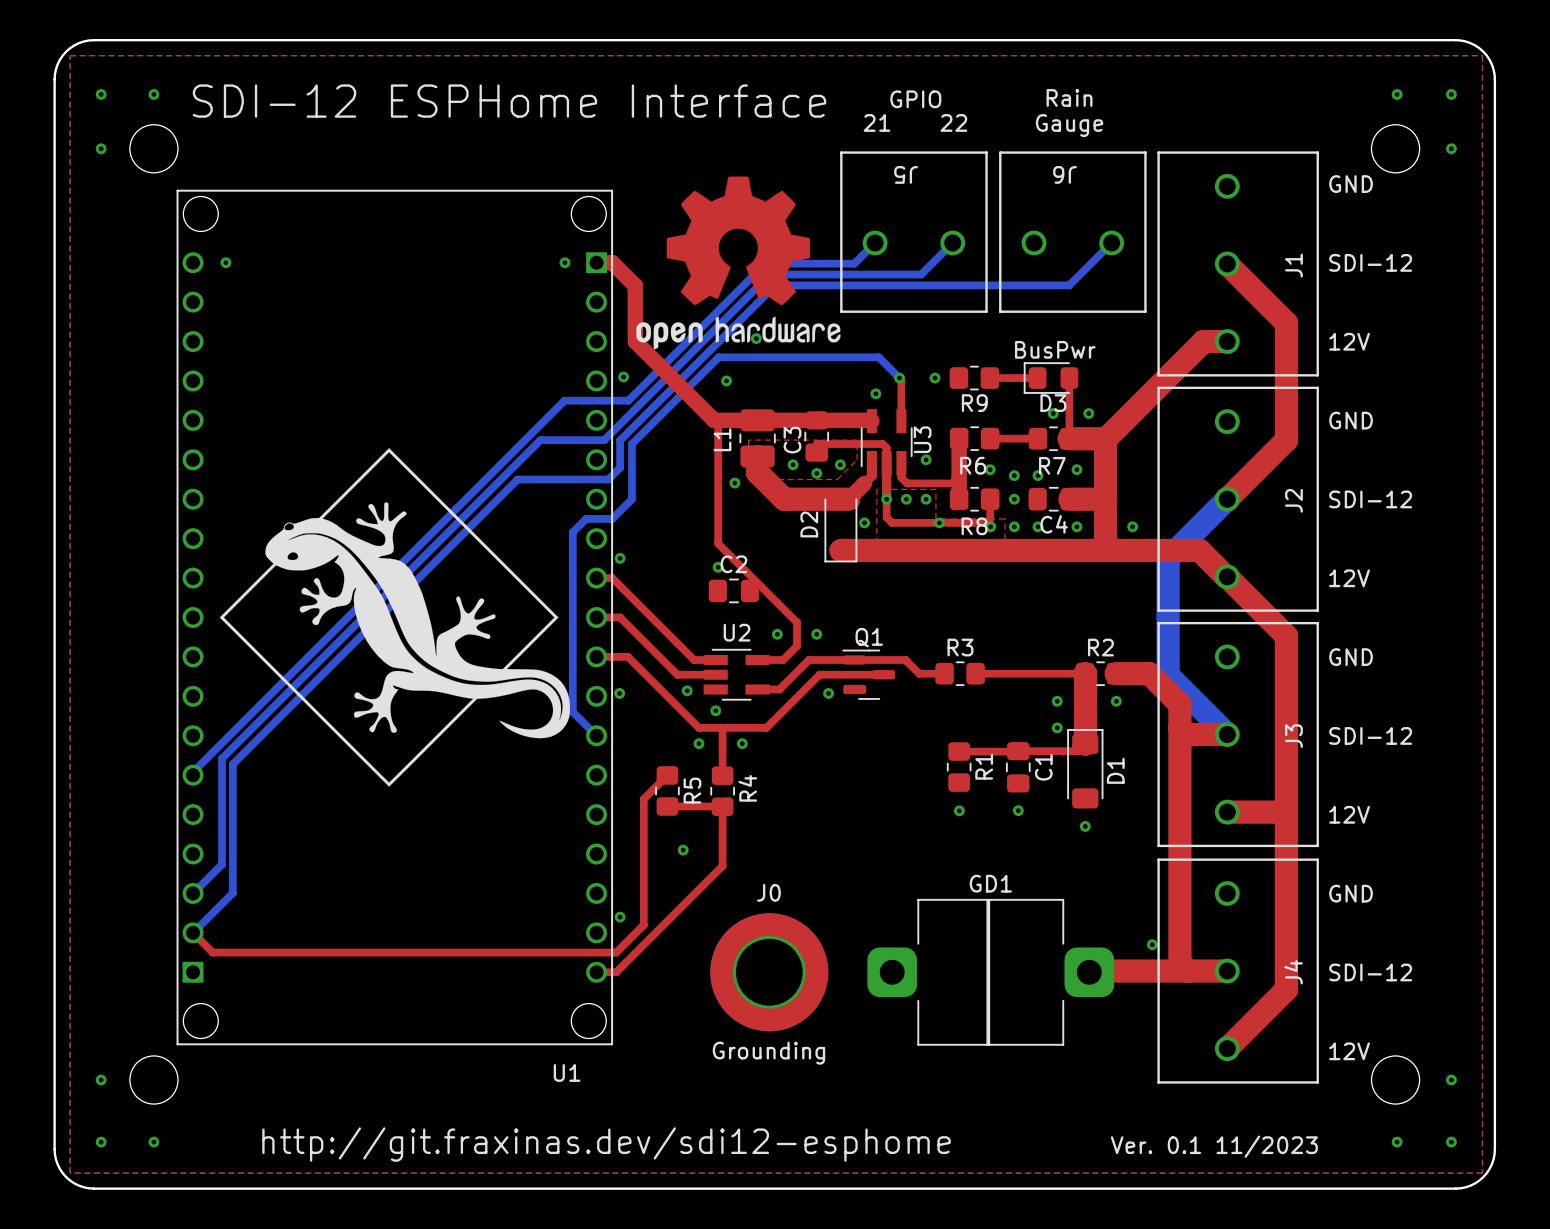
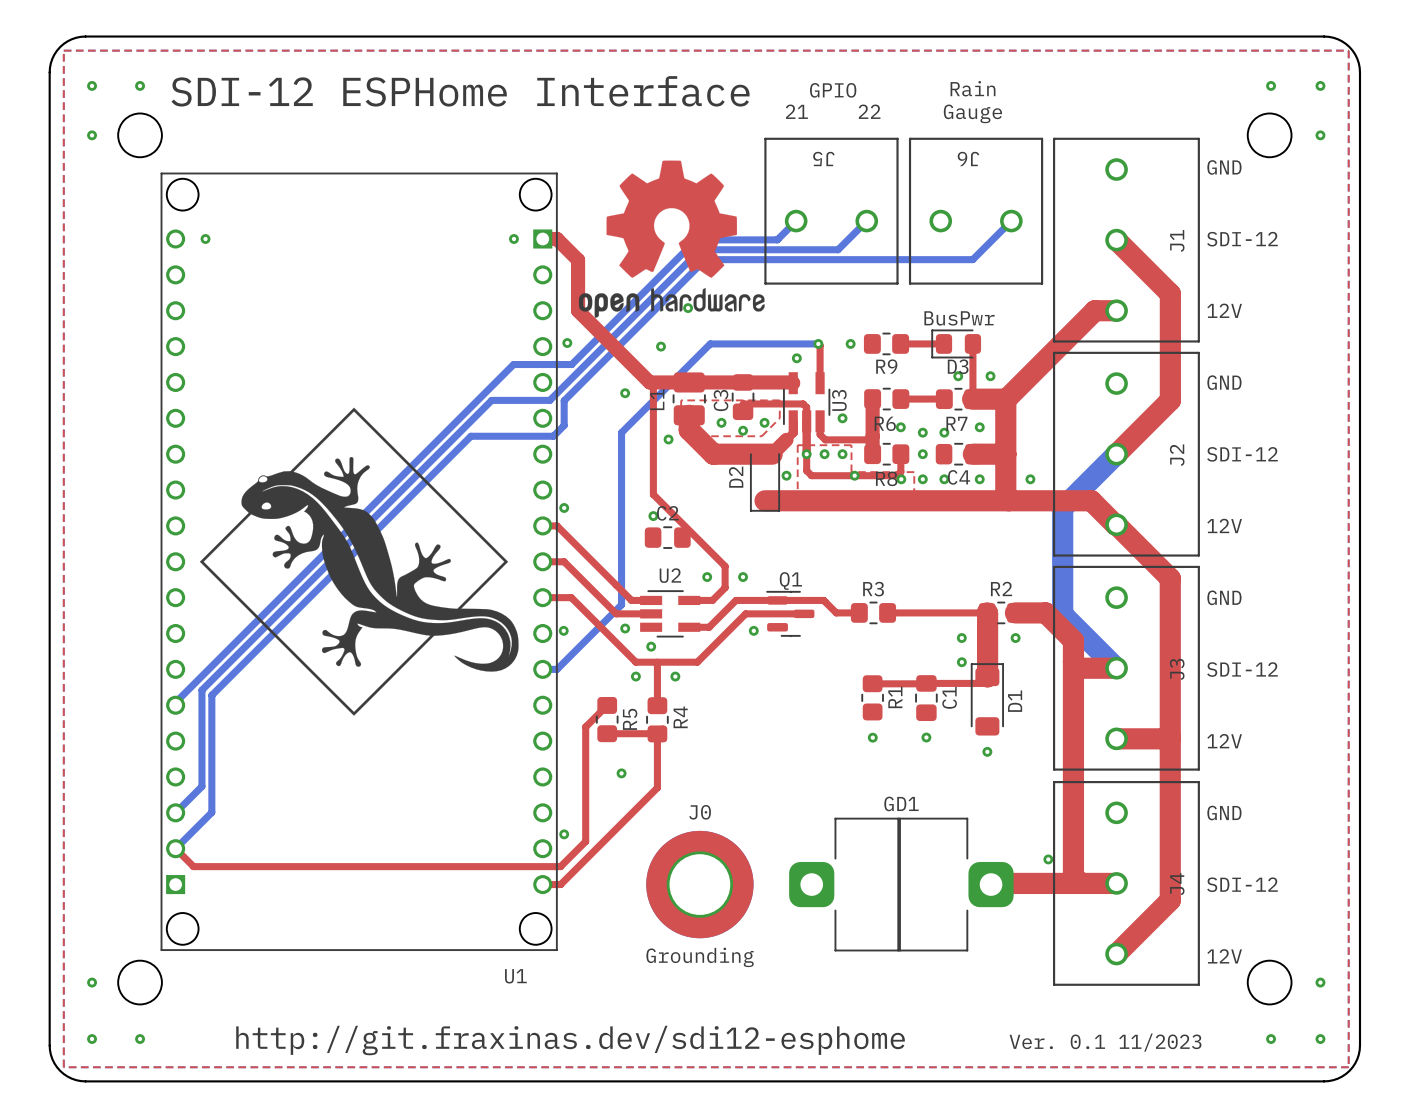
bottom track: (899, 378) (878, 357) (718, 357) (631, 444) (631, 499) (612, 518) (586, 518) (572, 532) (572, 712) (596, 735) -> (818, 343) (710, 343) (621, 432) (621, 604) (557, 669) (542, 669)
via: none -> (625, 393)

